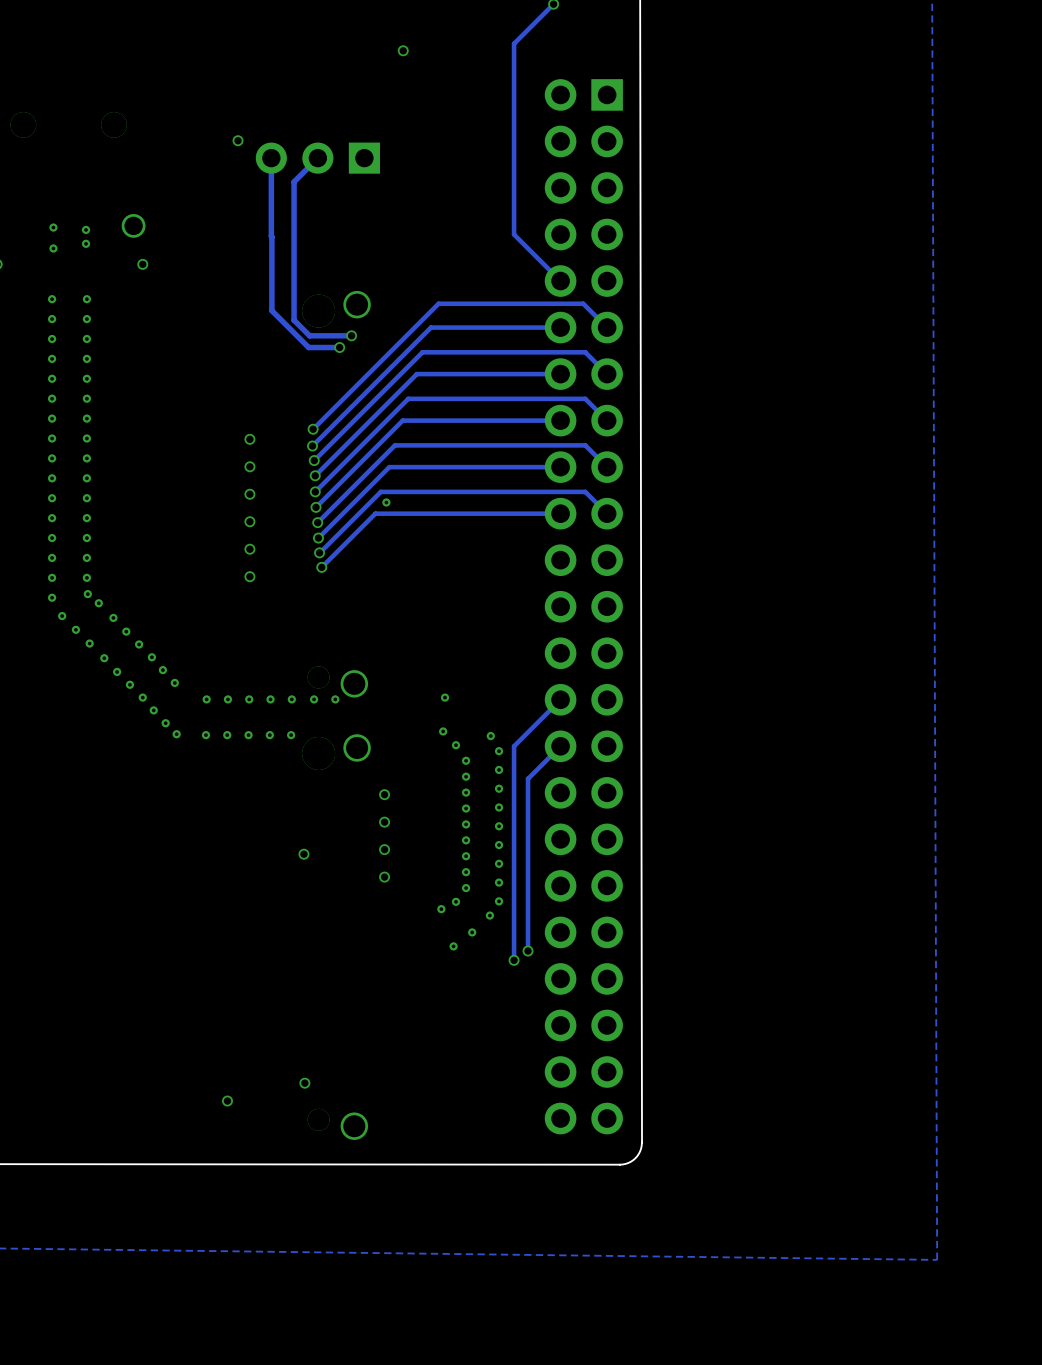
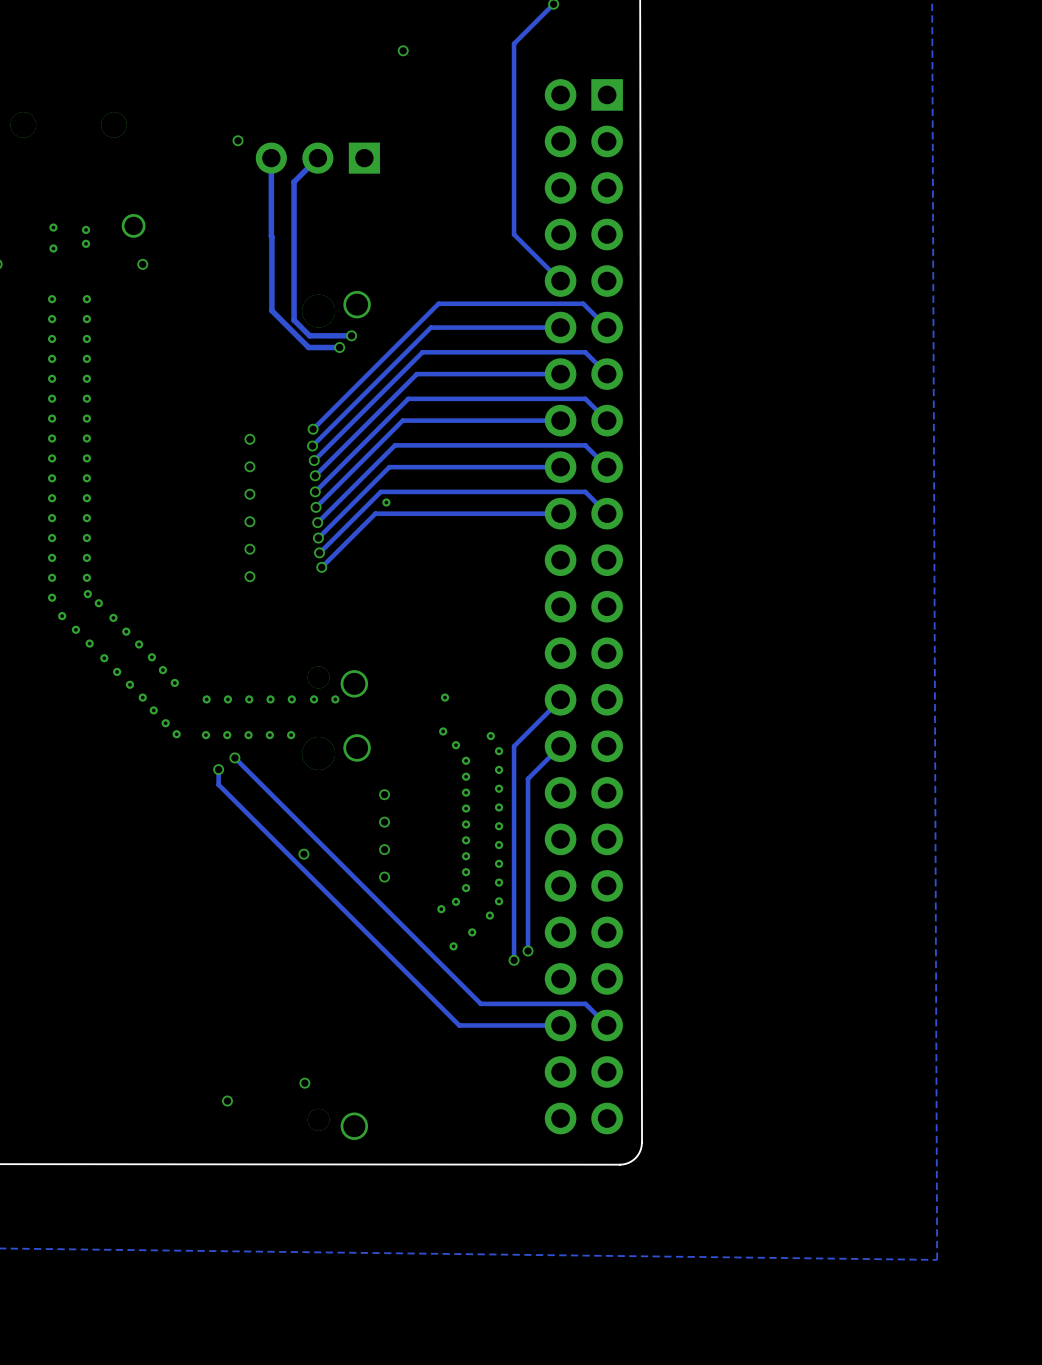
track: none -> (234, 757) (480, 1003) (585, 1003) (607, 1025)
via: none -> (234, 757)
track: none -> (218, 769) (218, 784) (459, 1025) (560, 1025)
via: none -> (218, 769)

